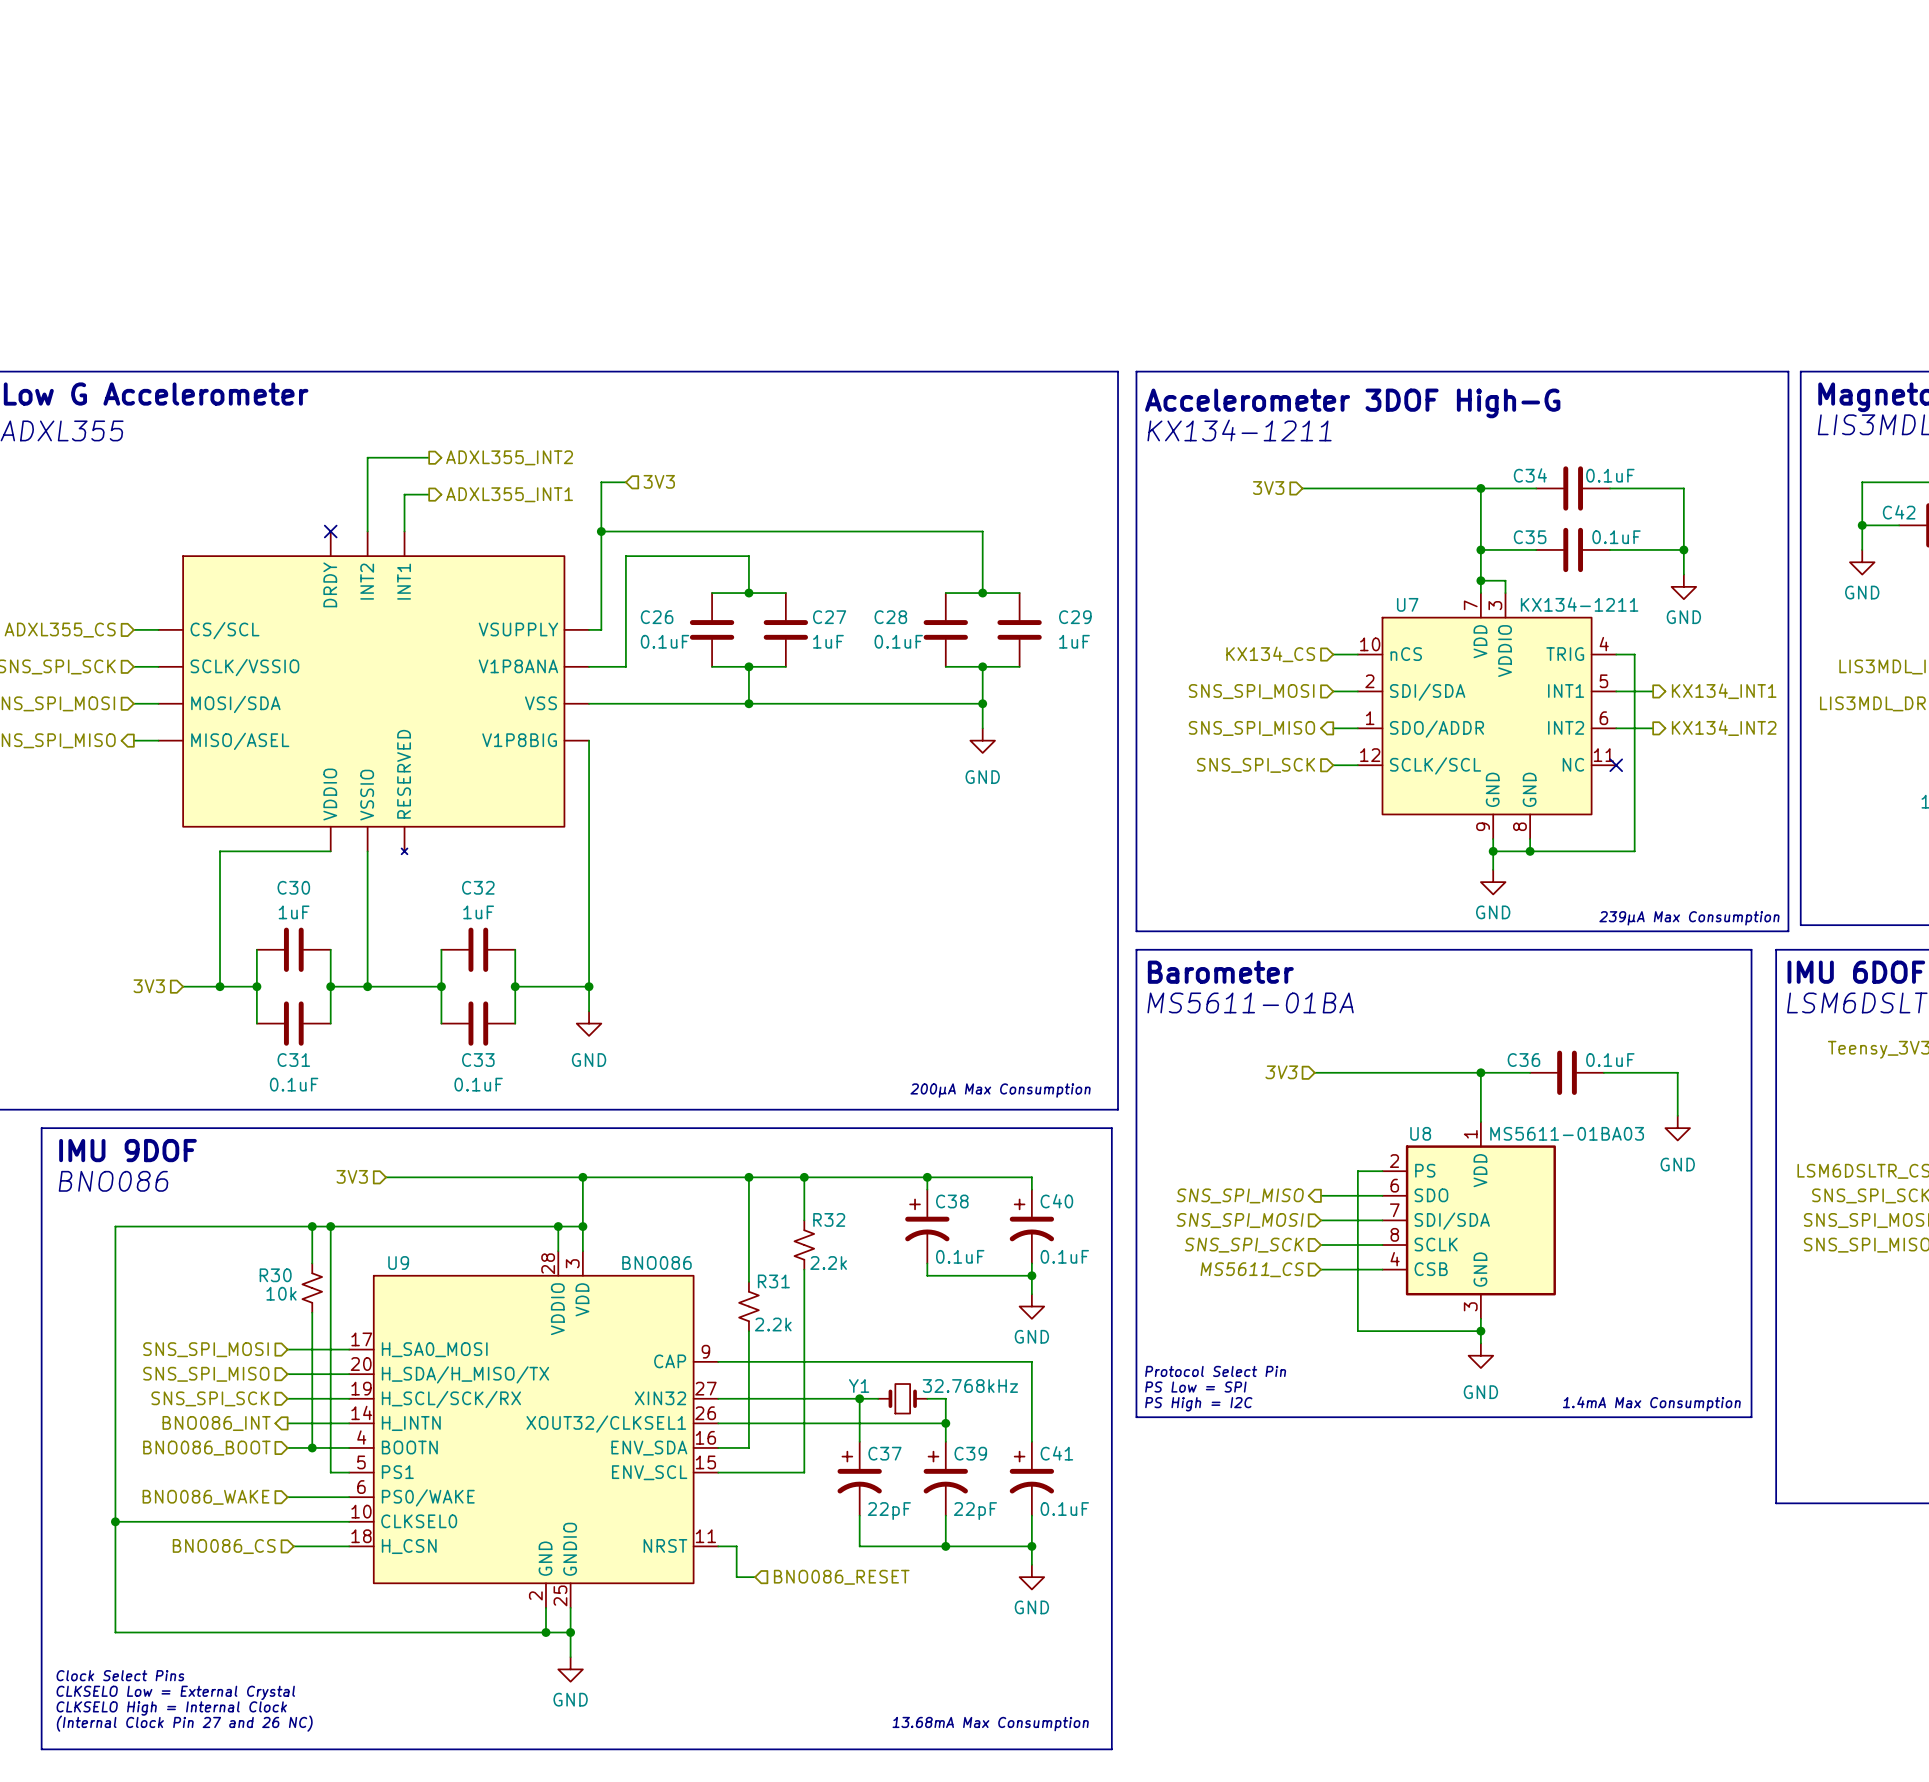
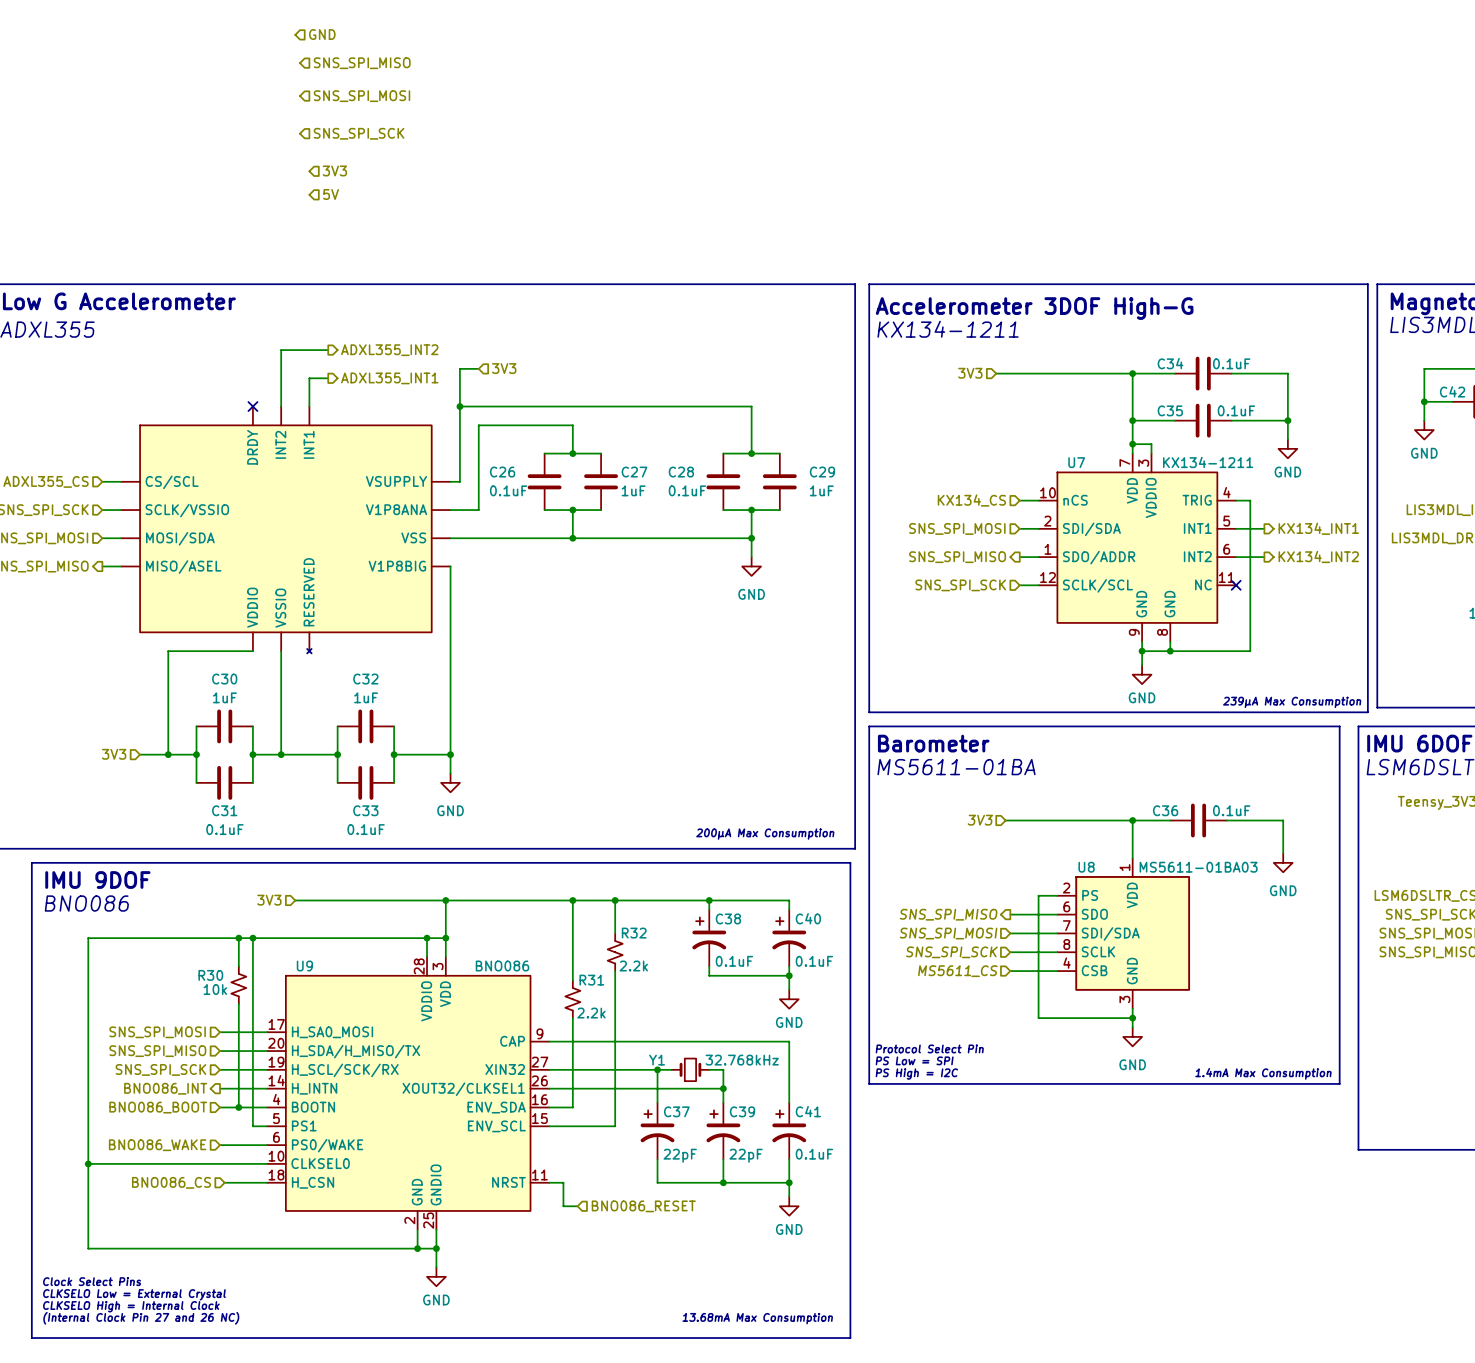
hierarchical label: none -> GND (322, 34)
hierarchical label: none -> SNS_SPI_MISO (362, 63)
hierarchical label: none -> SNS_SPI_MOSI (361, 96)
hierarchical label: none -> SNS_SPI_SCK (359, 133)
hierarchical label: none -> 3V3 (334, 170)
hierarchical label: none -> 5V (331, 194)

